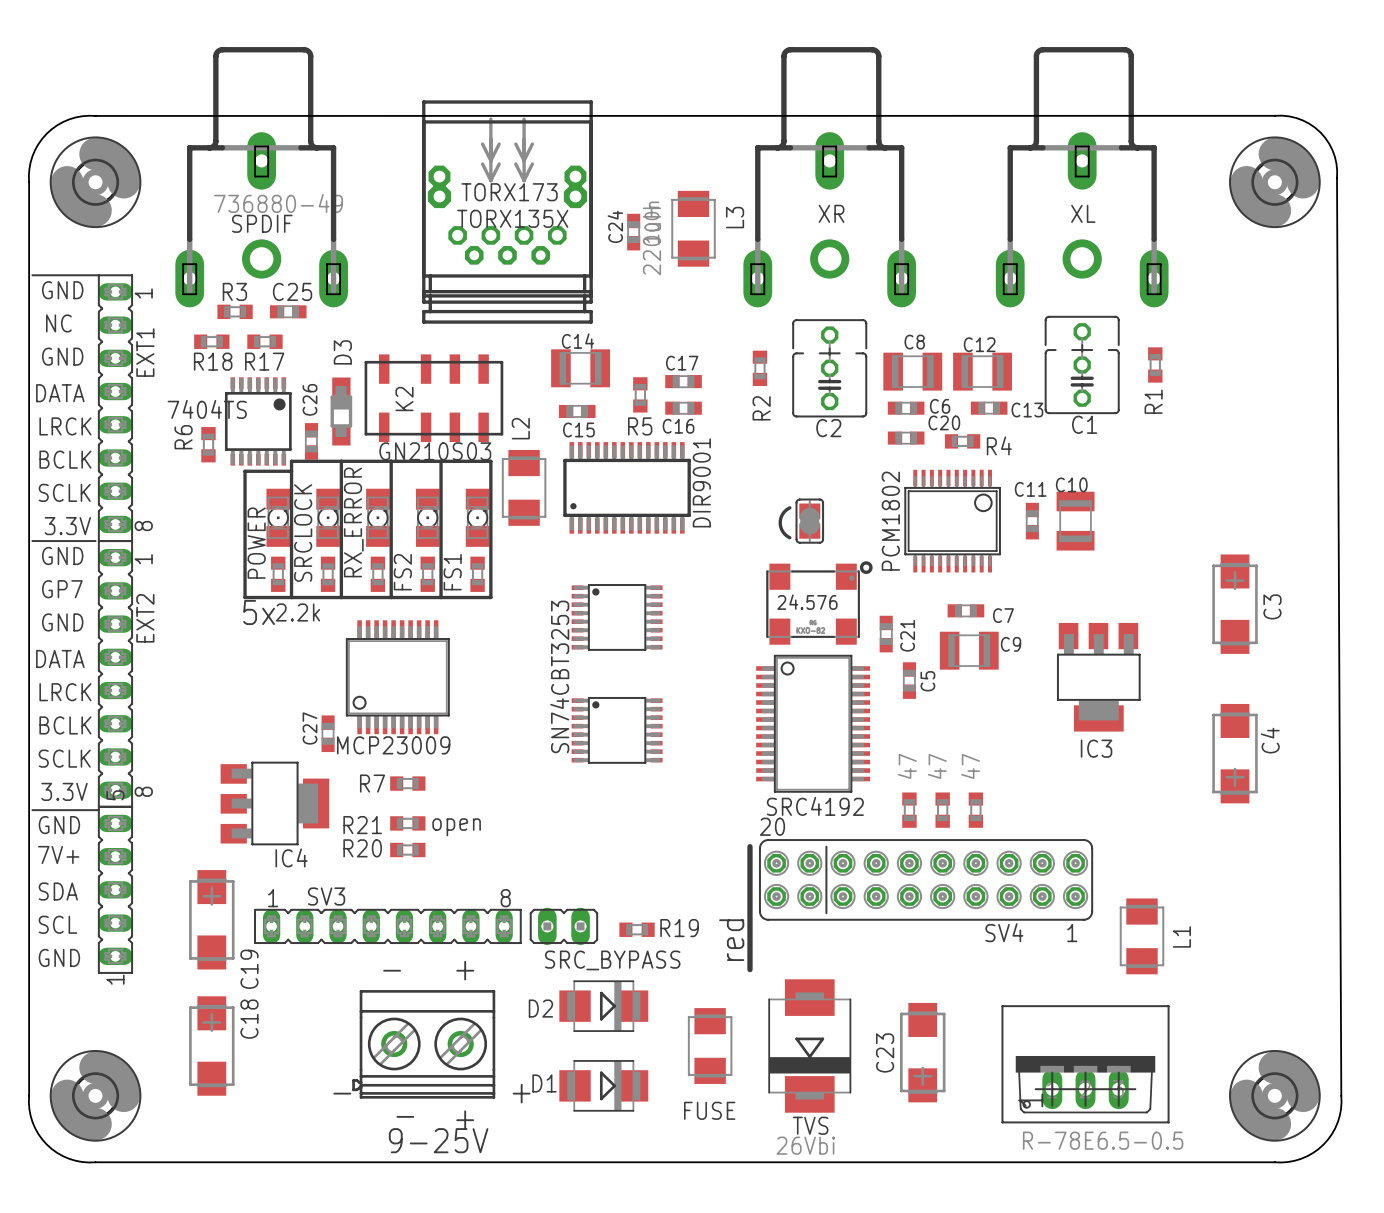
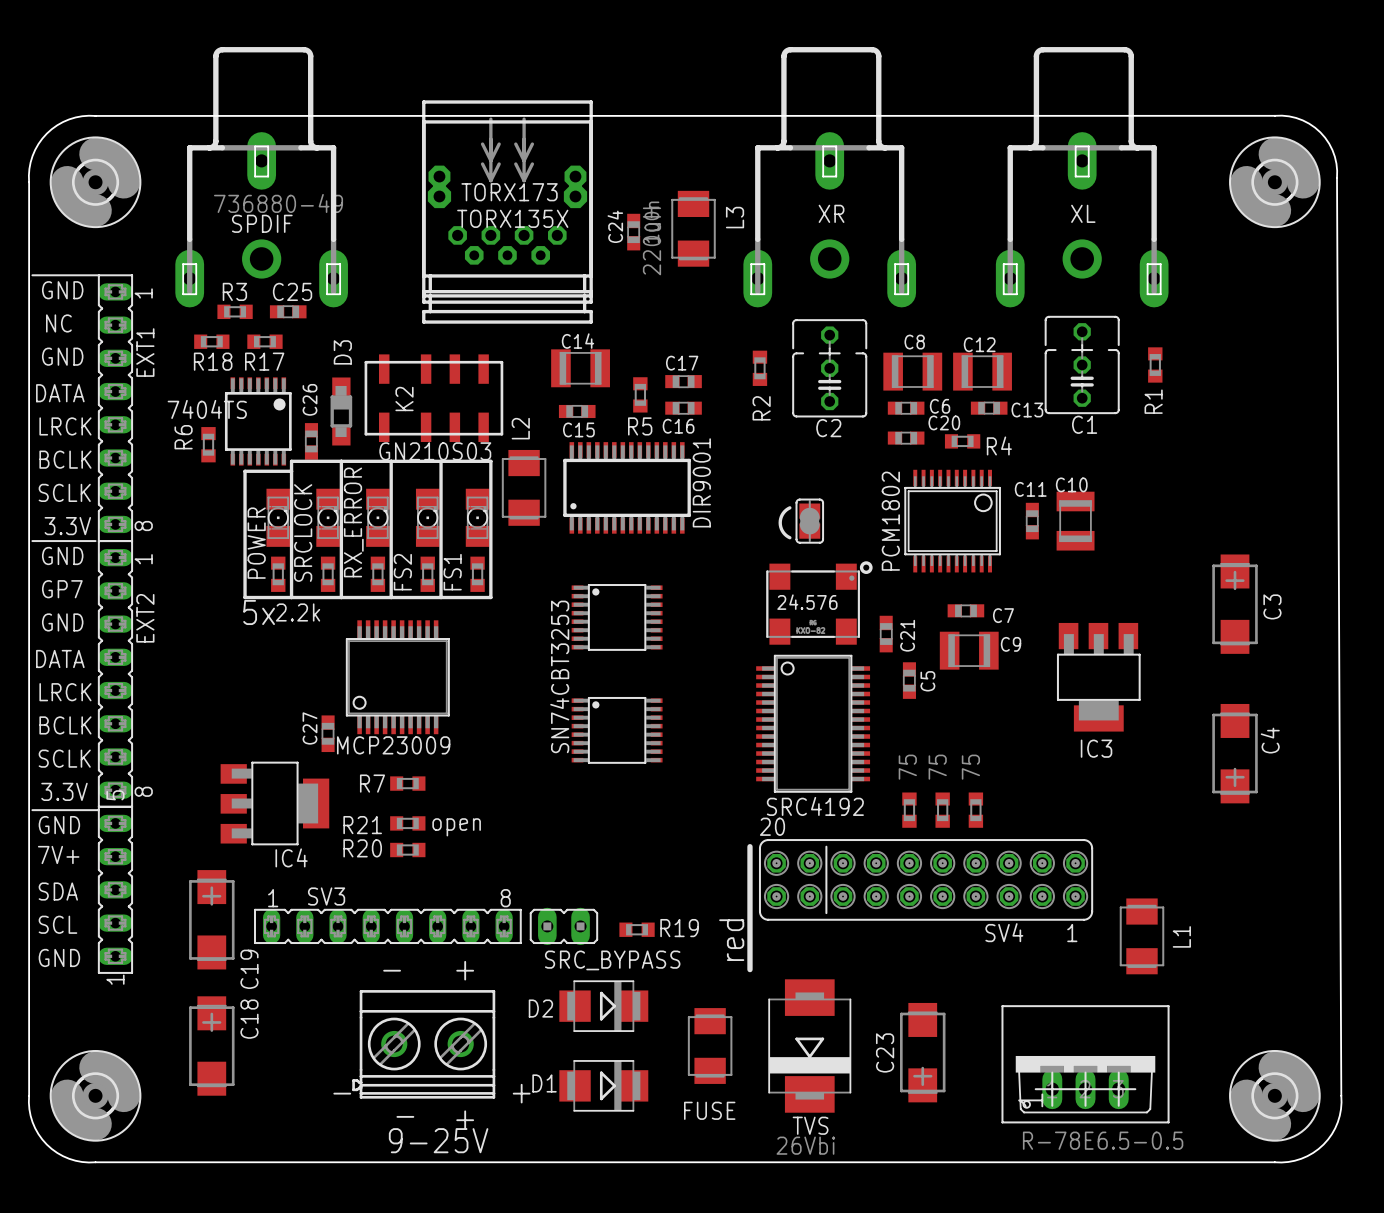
part value: 47 (907, 766) -> 75 (907, 767)
part value: 47 (937, 766) -> 75 (937, 767)
part value: 47 (970, 766) -> 75 (970, 767)

